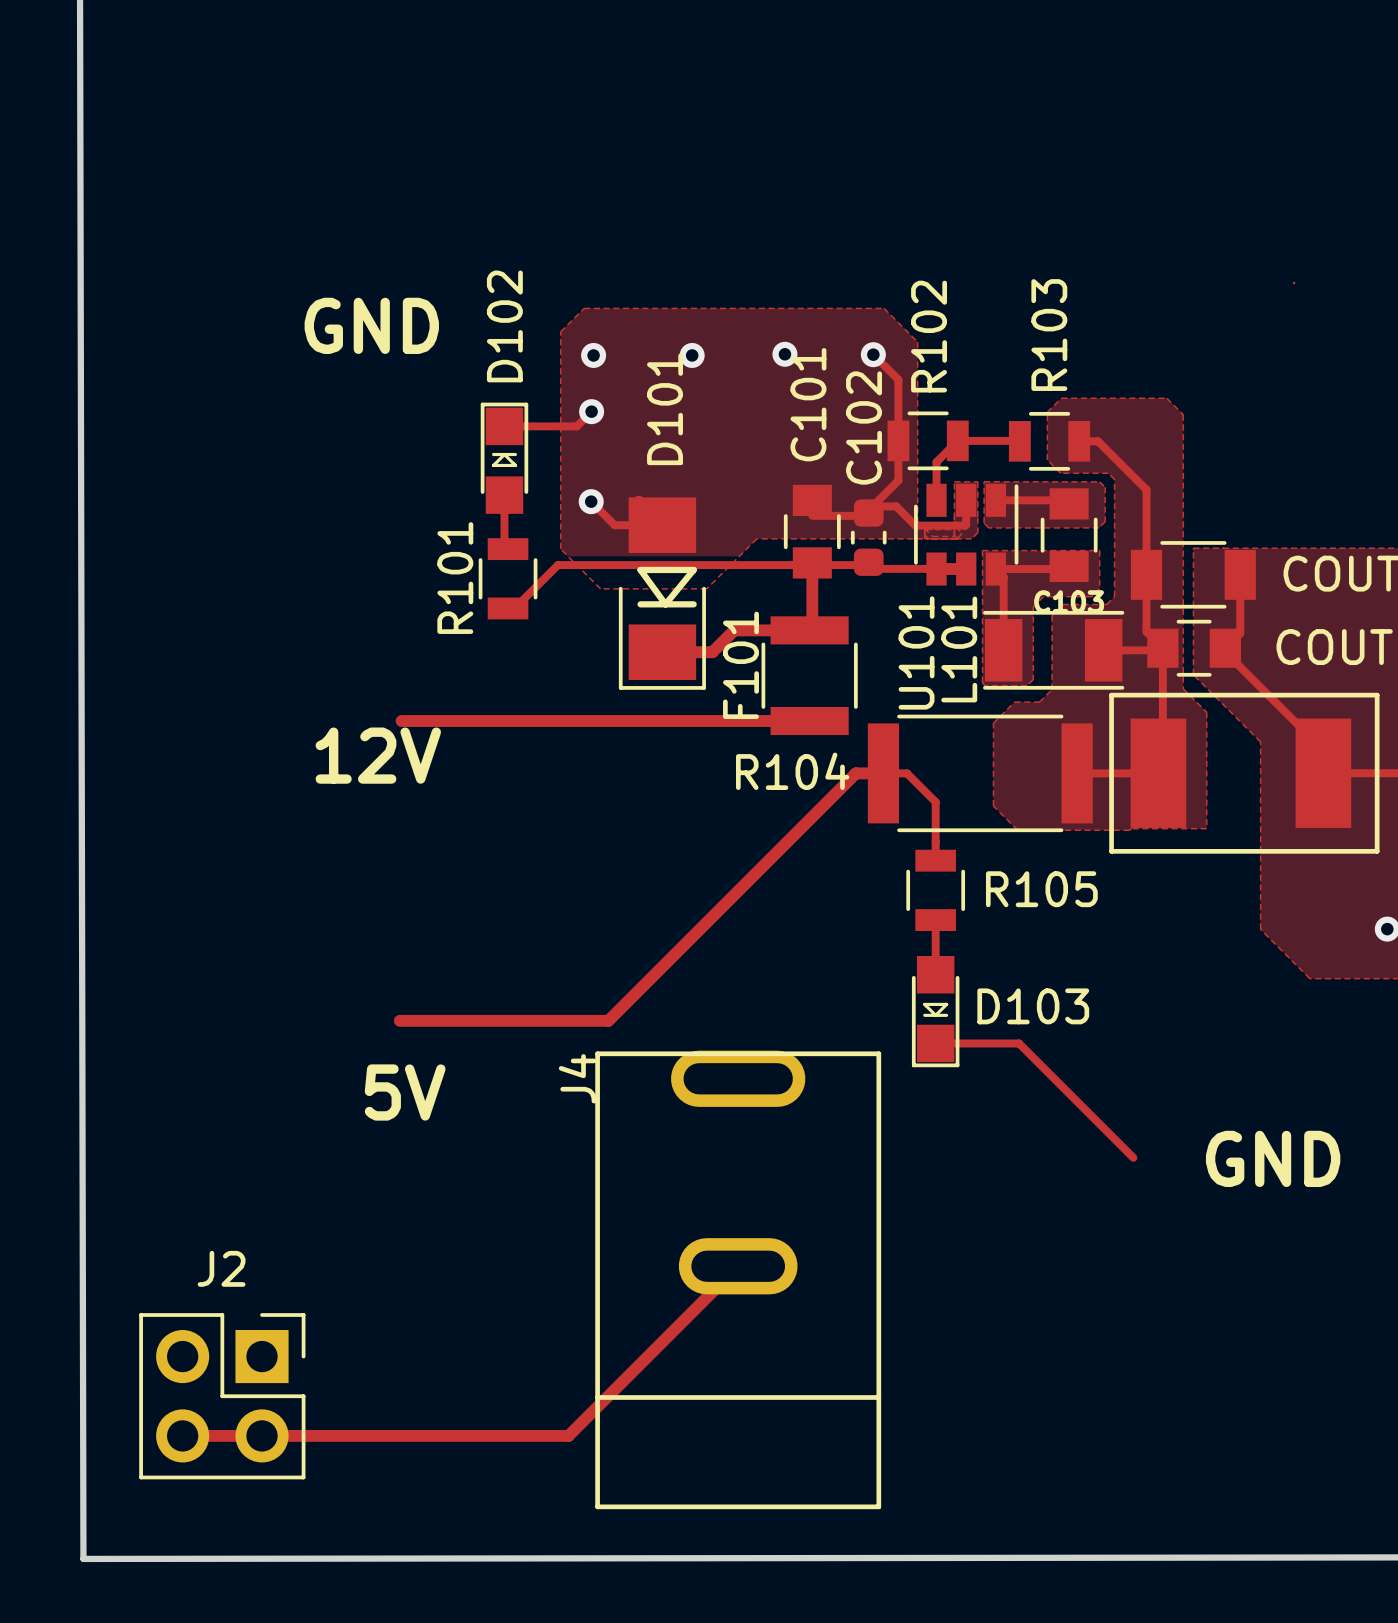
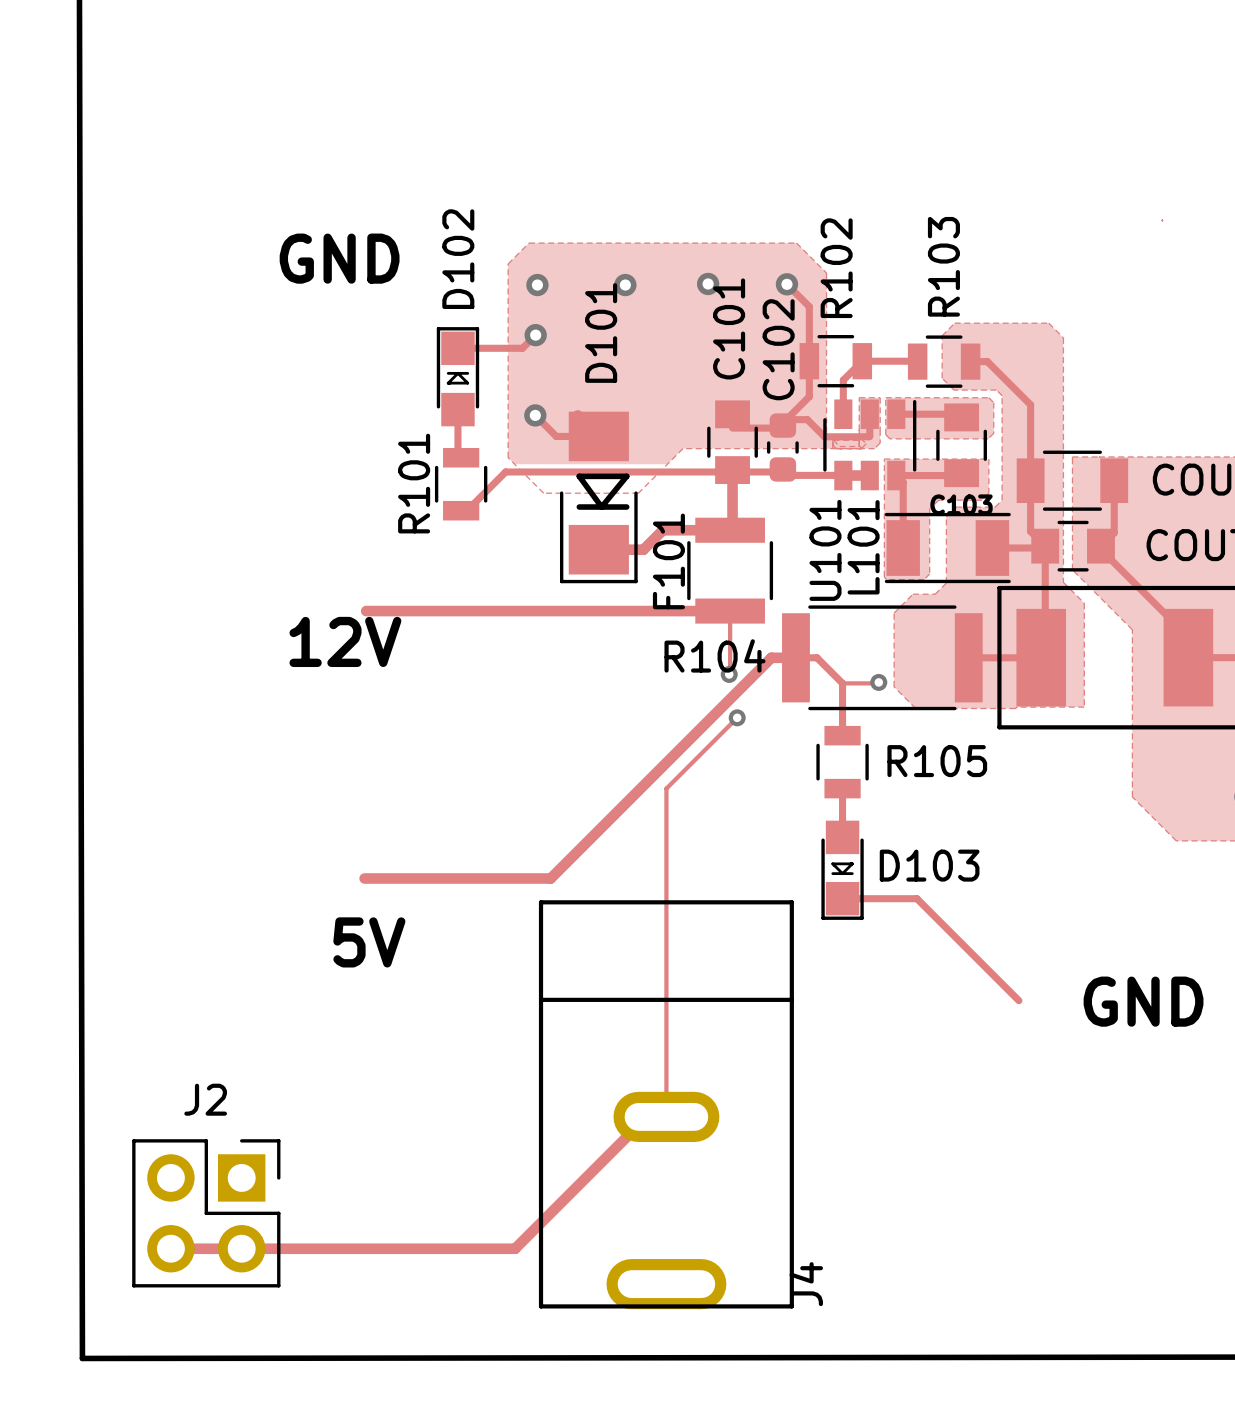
track: none -> (730, 611) (729, 674)
via: none -> (729, 674)
track: none -> (878, 682) (842, 683)
via: none -> (878, 682)
track: none -> (737, 717) (666, 788) (666, 1116)
via: none -> (737, 717)
J4 rotation: 0° (738, 1279) -> 180° (666, 1104)

